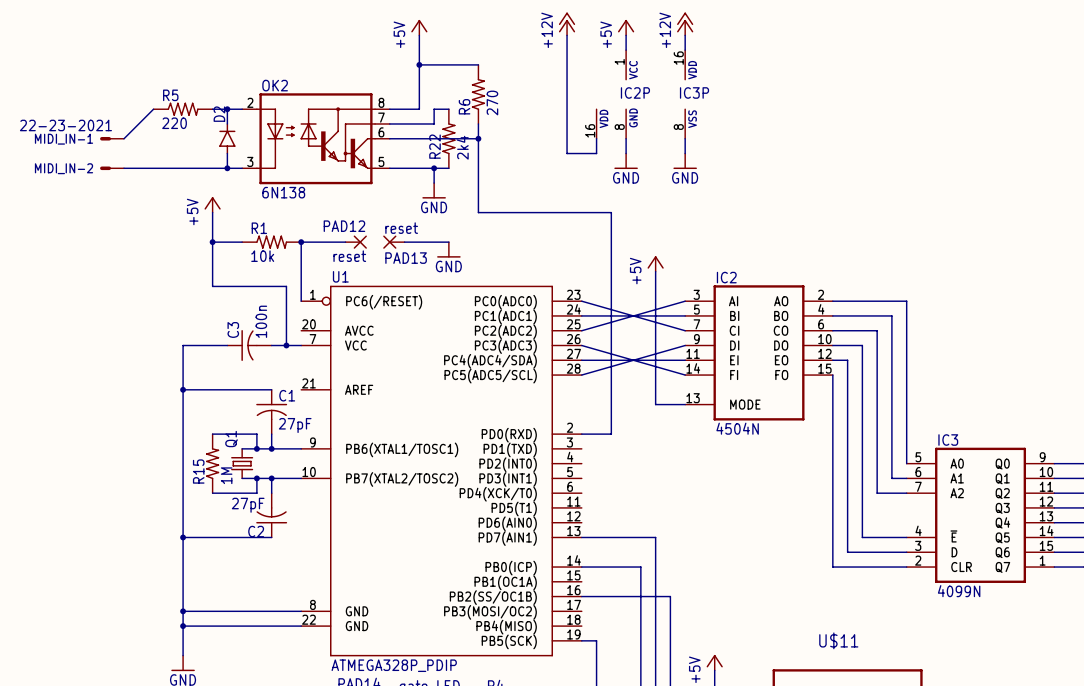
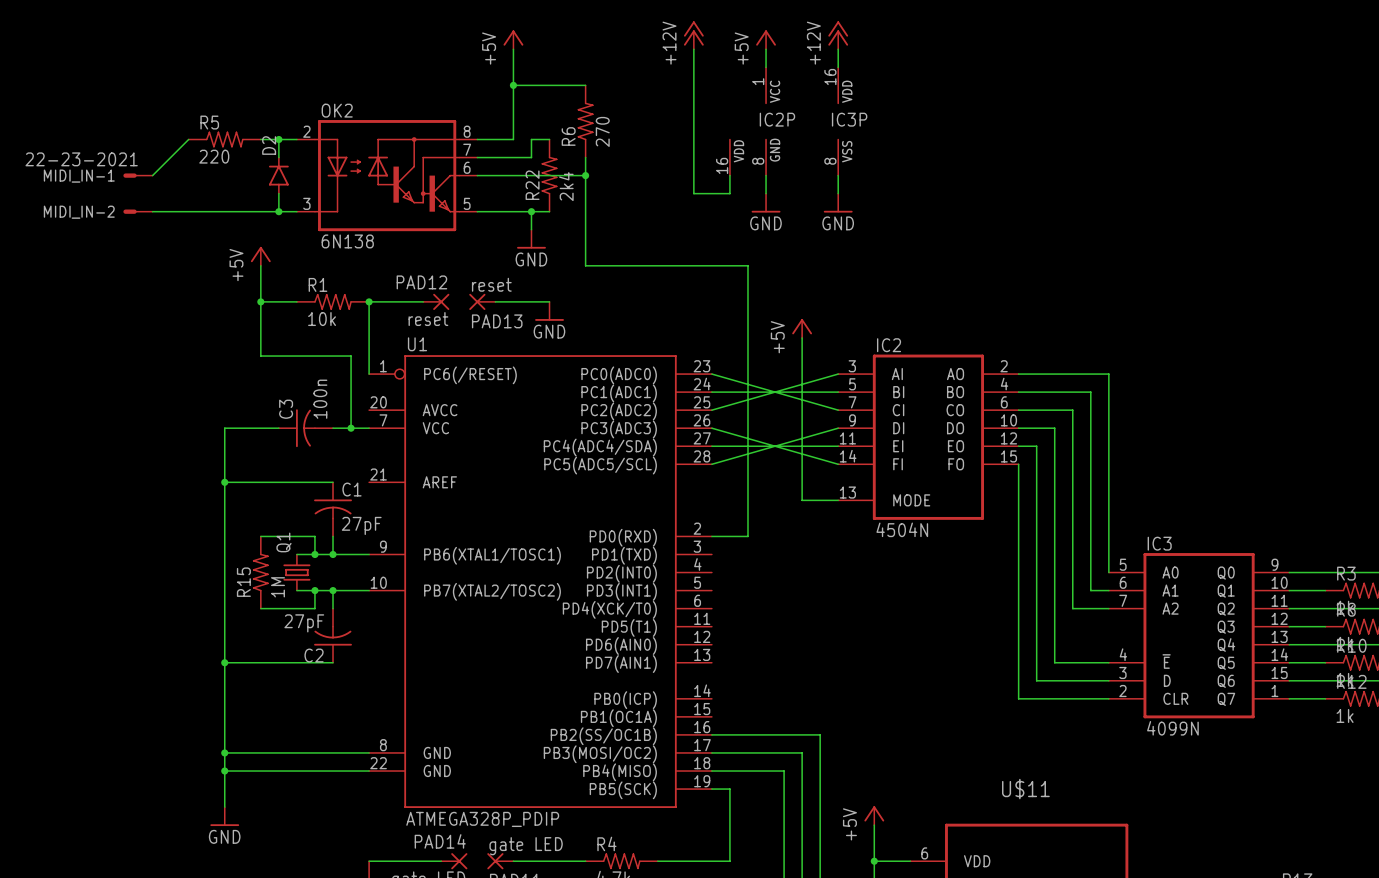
wire: (581, 537) (655, 537) (655, 611) -> (711, 752) (802, 752)
wire: (581, 567) (640, 567) (640, 626) -> (711, 771) (784, 771)

